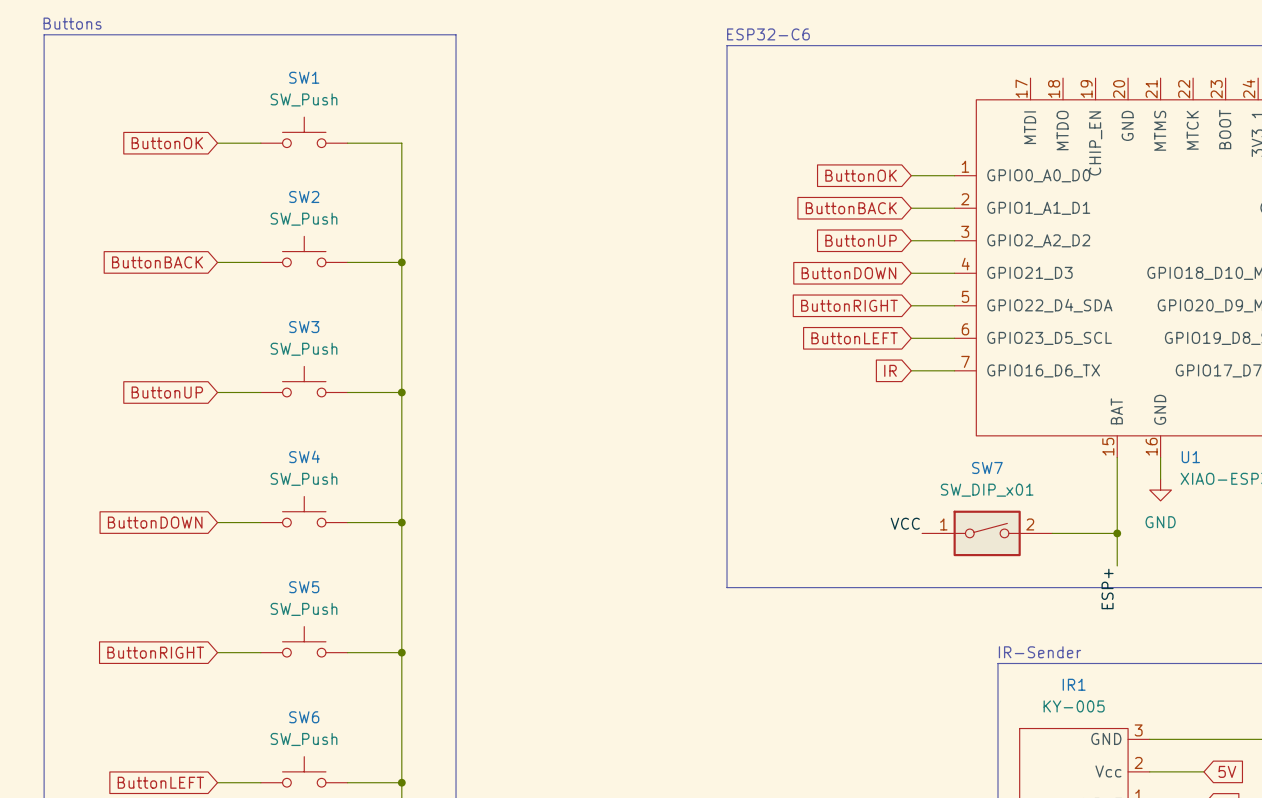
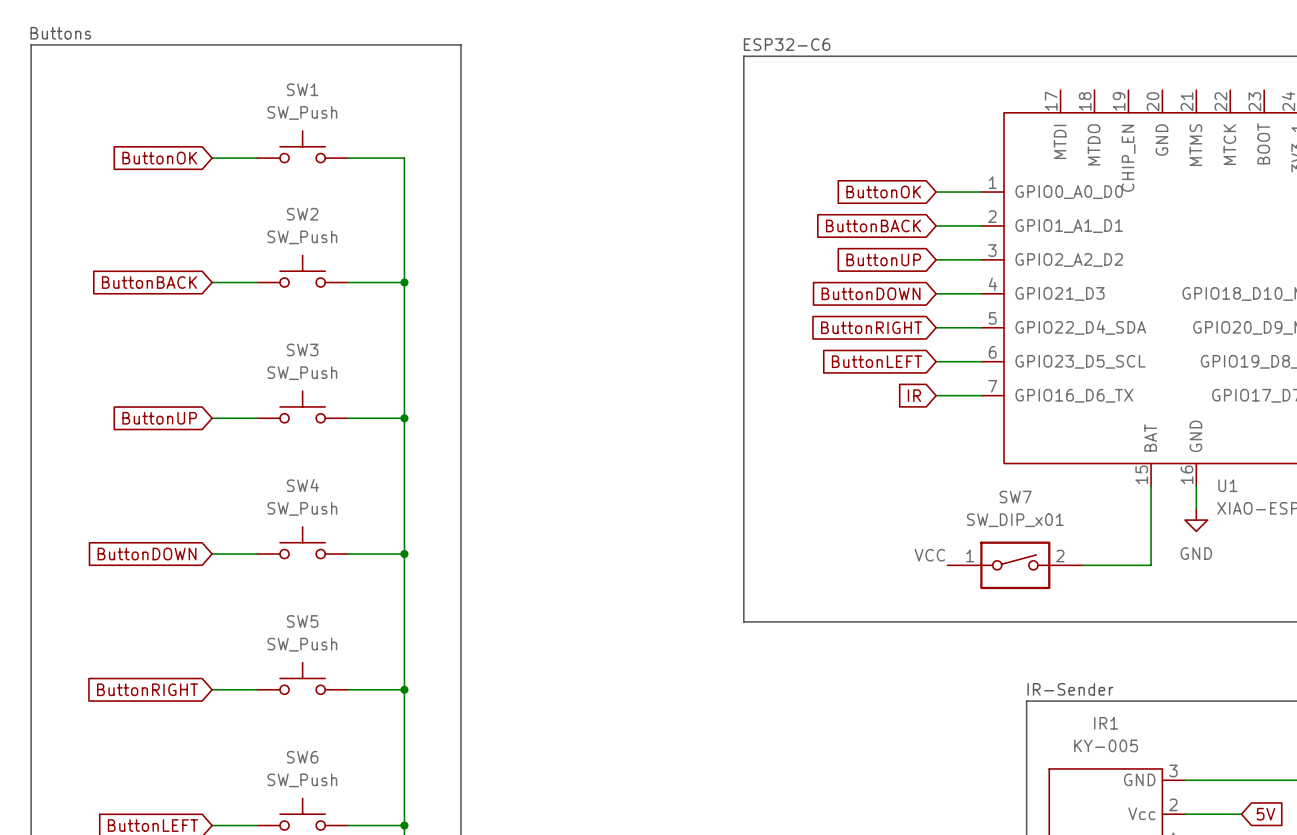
wire: (1117, 533) (1117, 565) -> none
junction: (1117, 533) -> none
label: ESP+ (1107, 588) -> none

